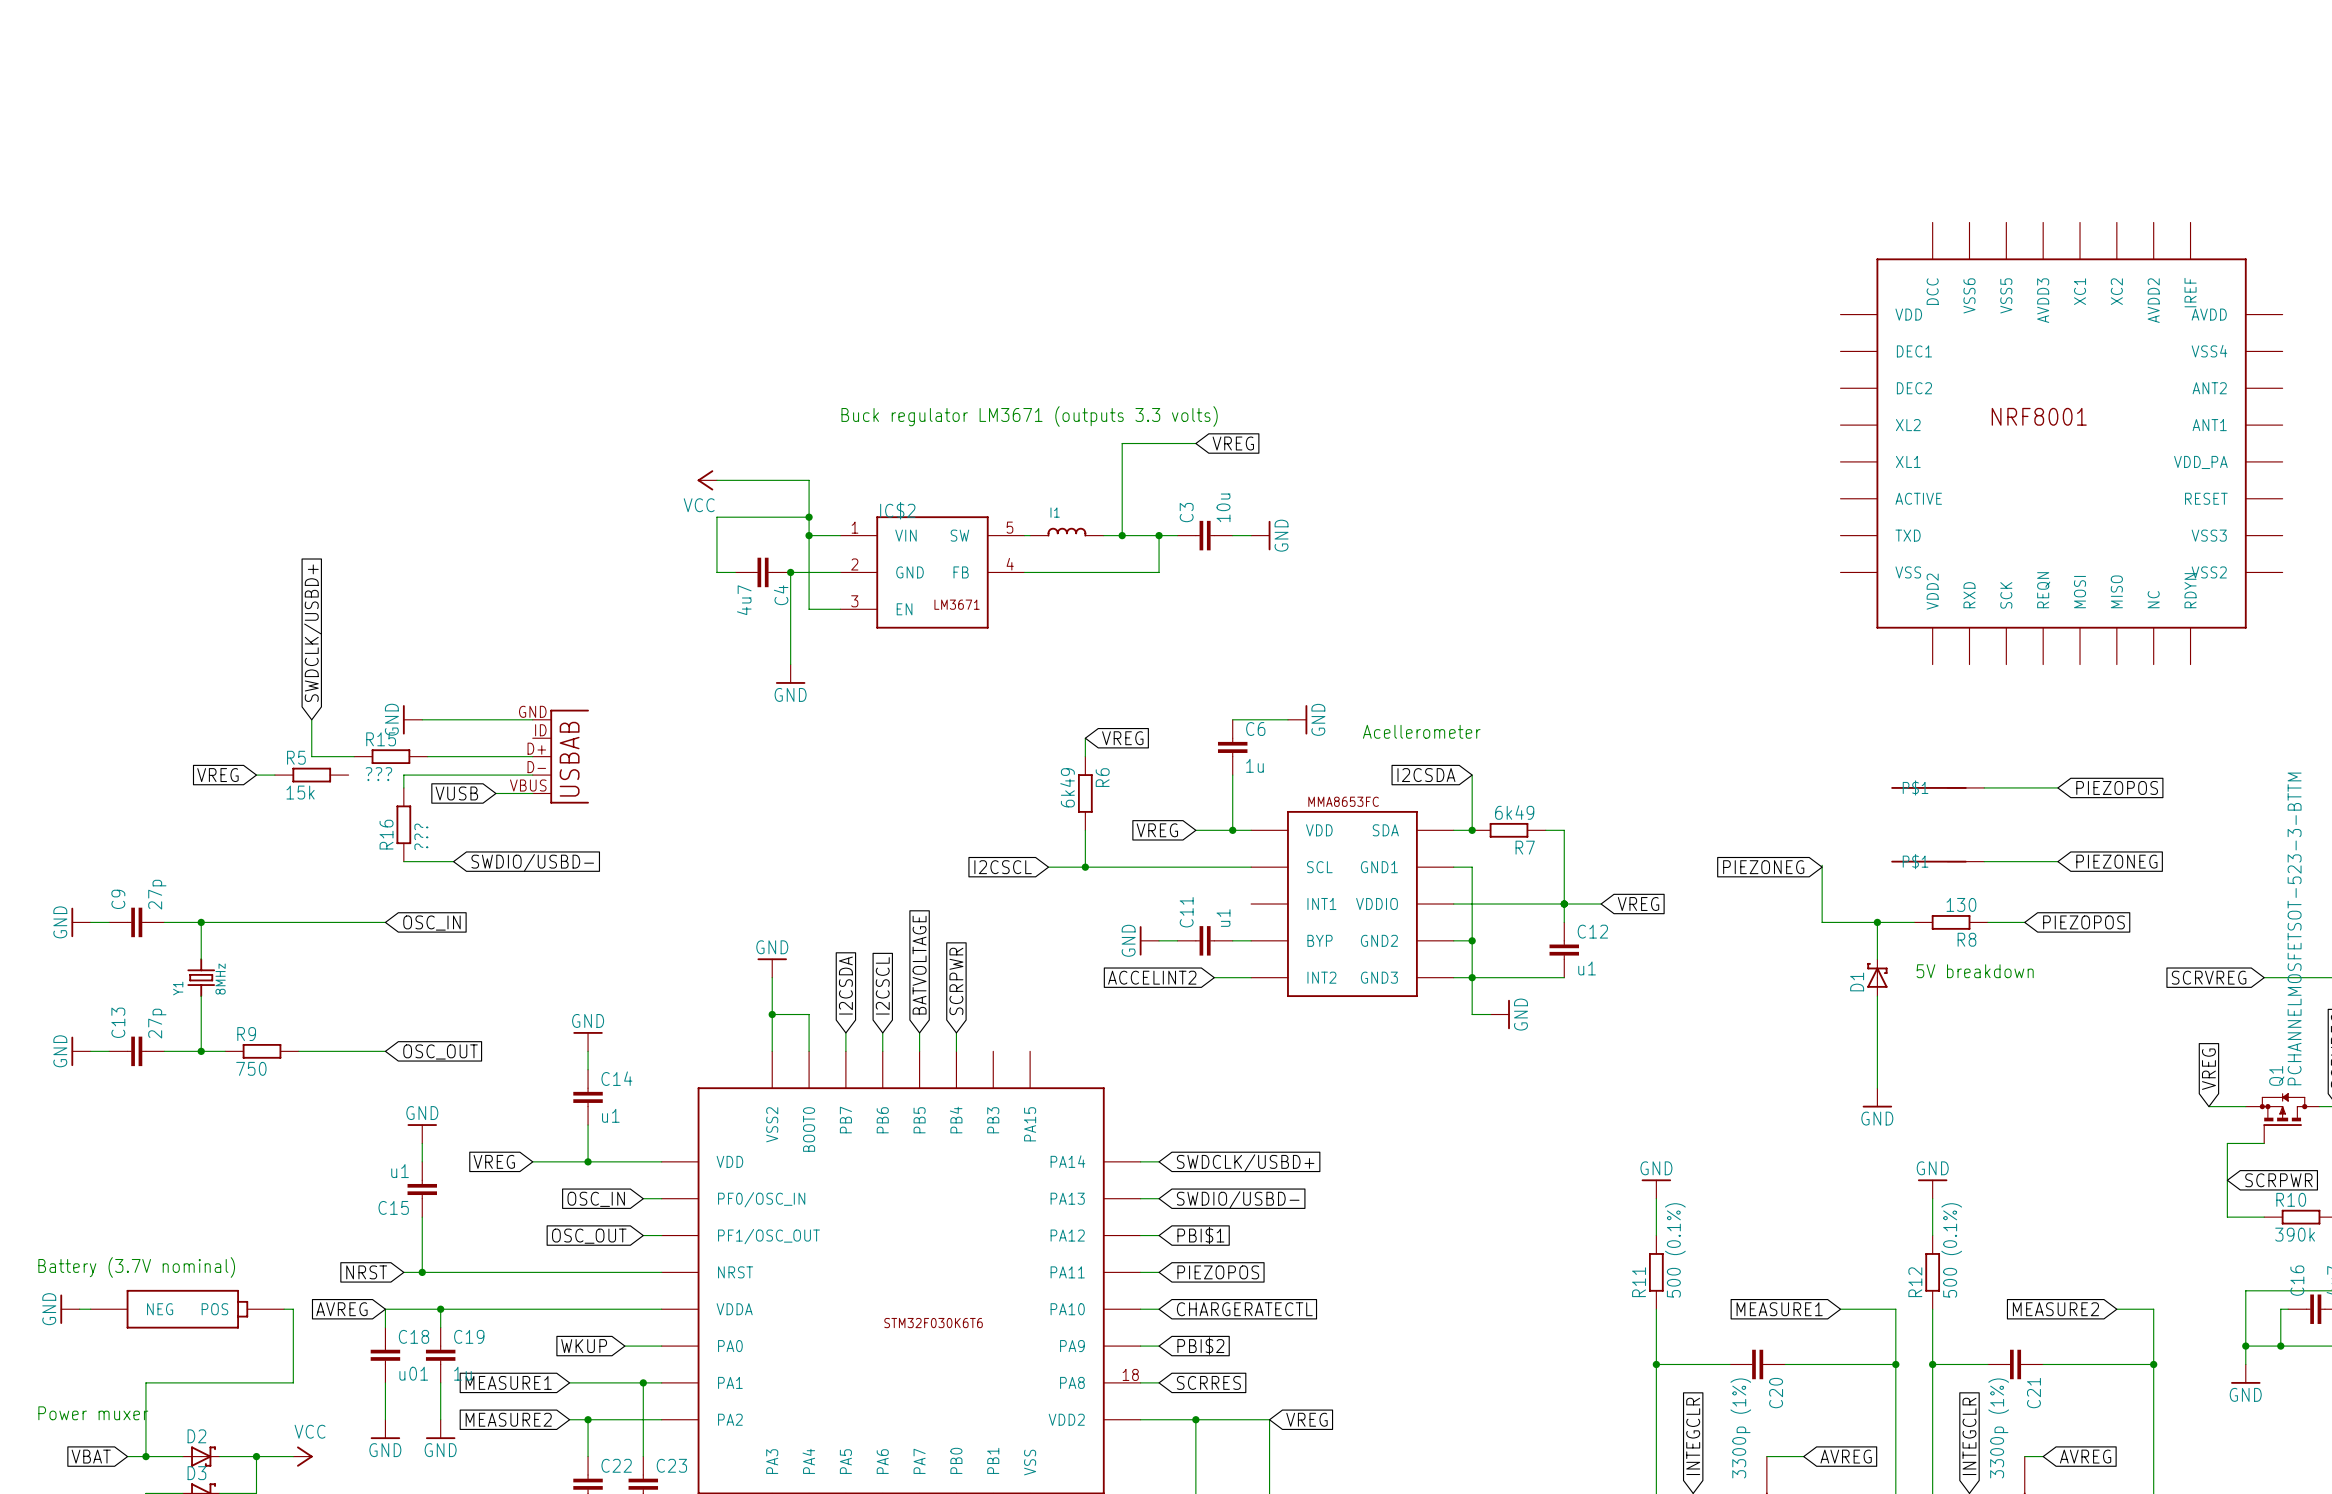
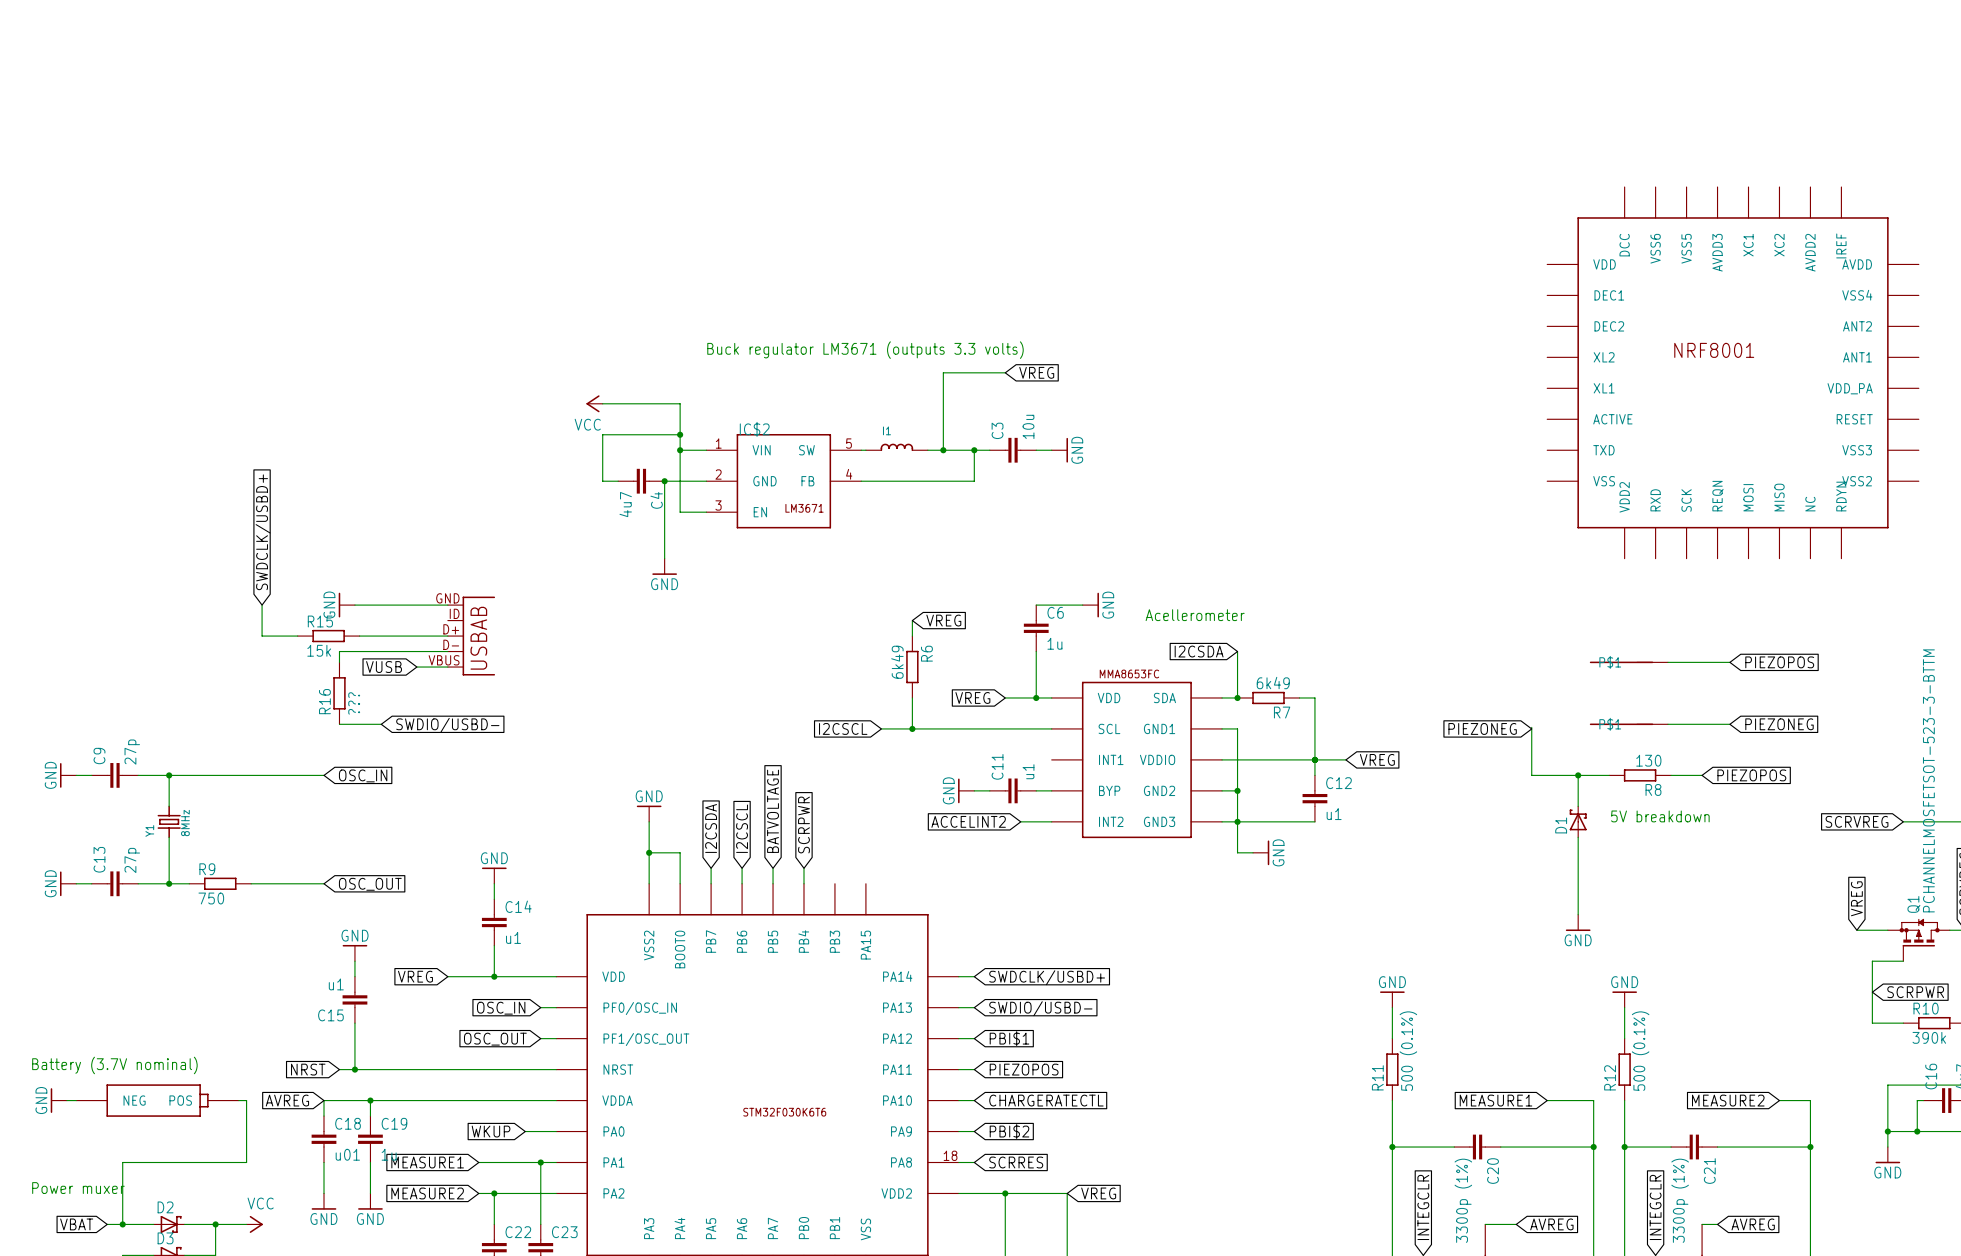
R15 value: ??? (378, 774) -> 15k (319, 650)
global label: VREG (217, 775) -> none
wire: (256, 775) (274, 775) -> none
R5: 15k (311, 775) -> none

